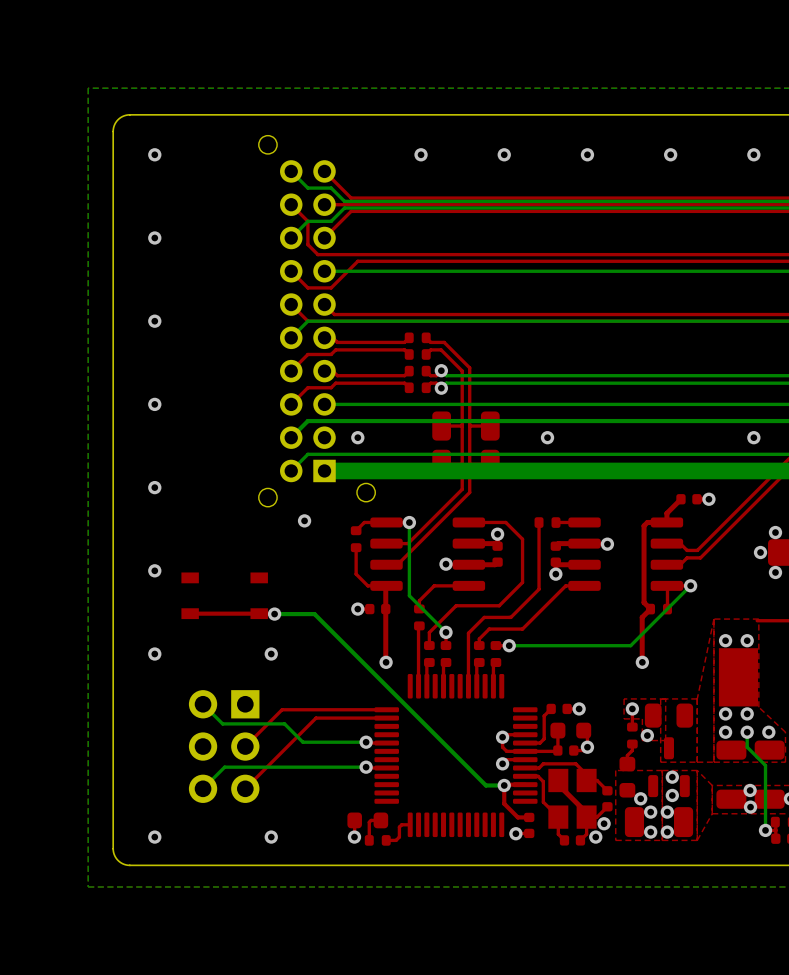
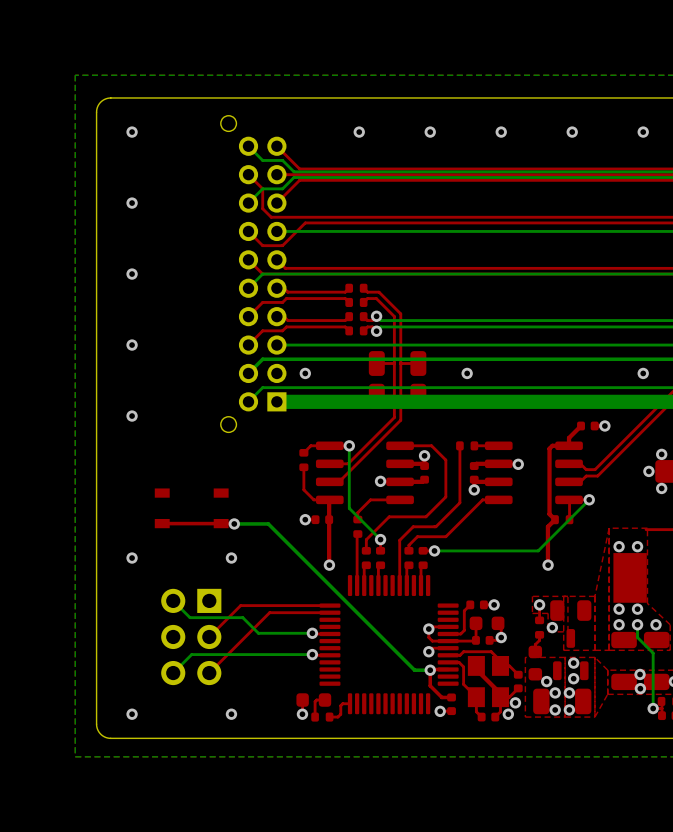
part: (317, 321) -> none
via: (304, 520) -> none
via: (154, 570) -> none

